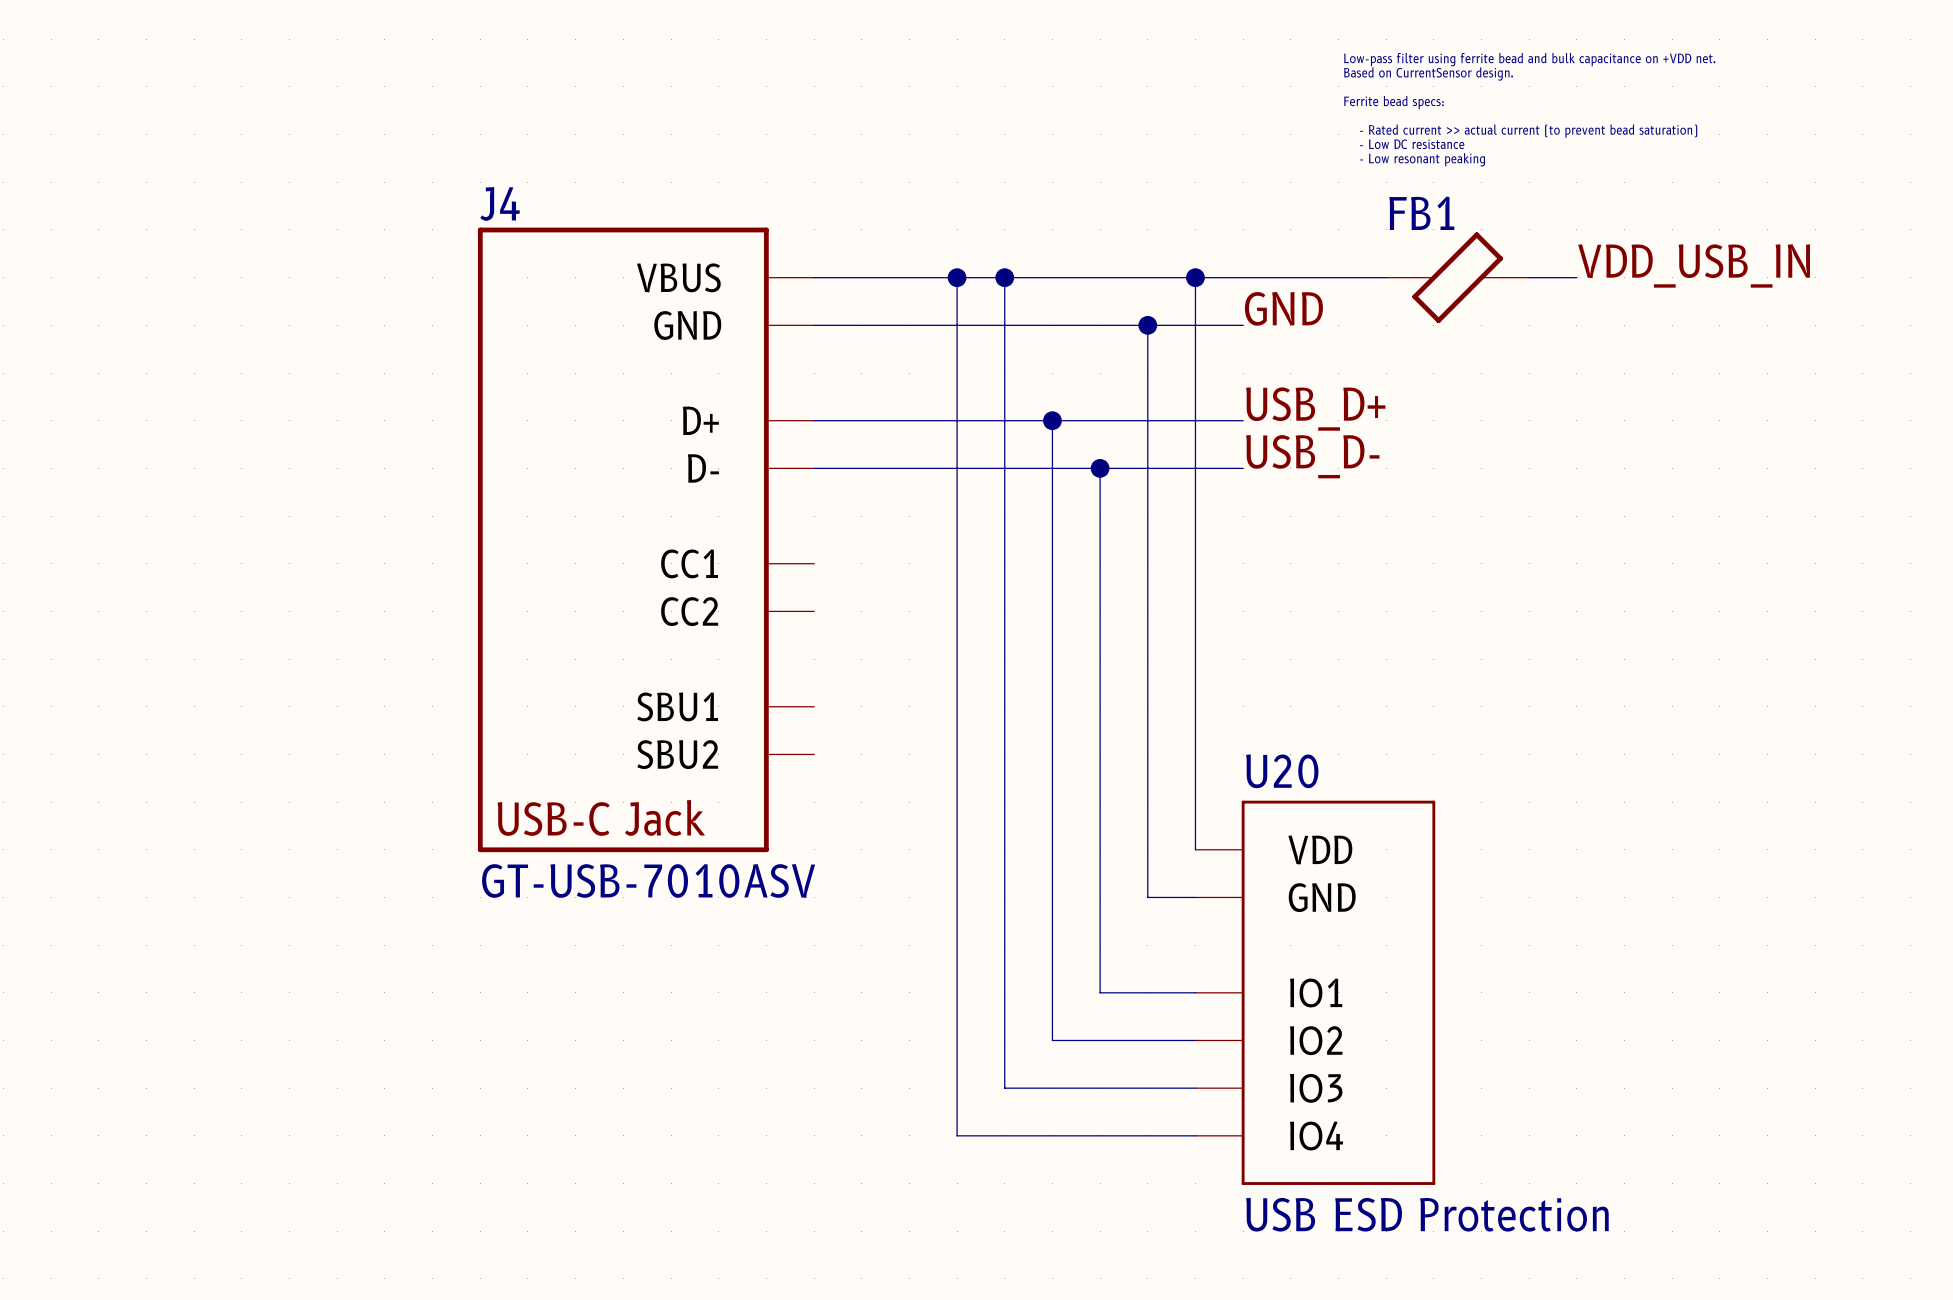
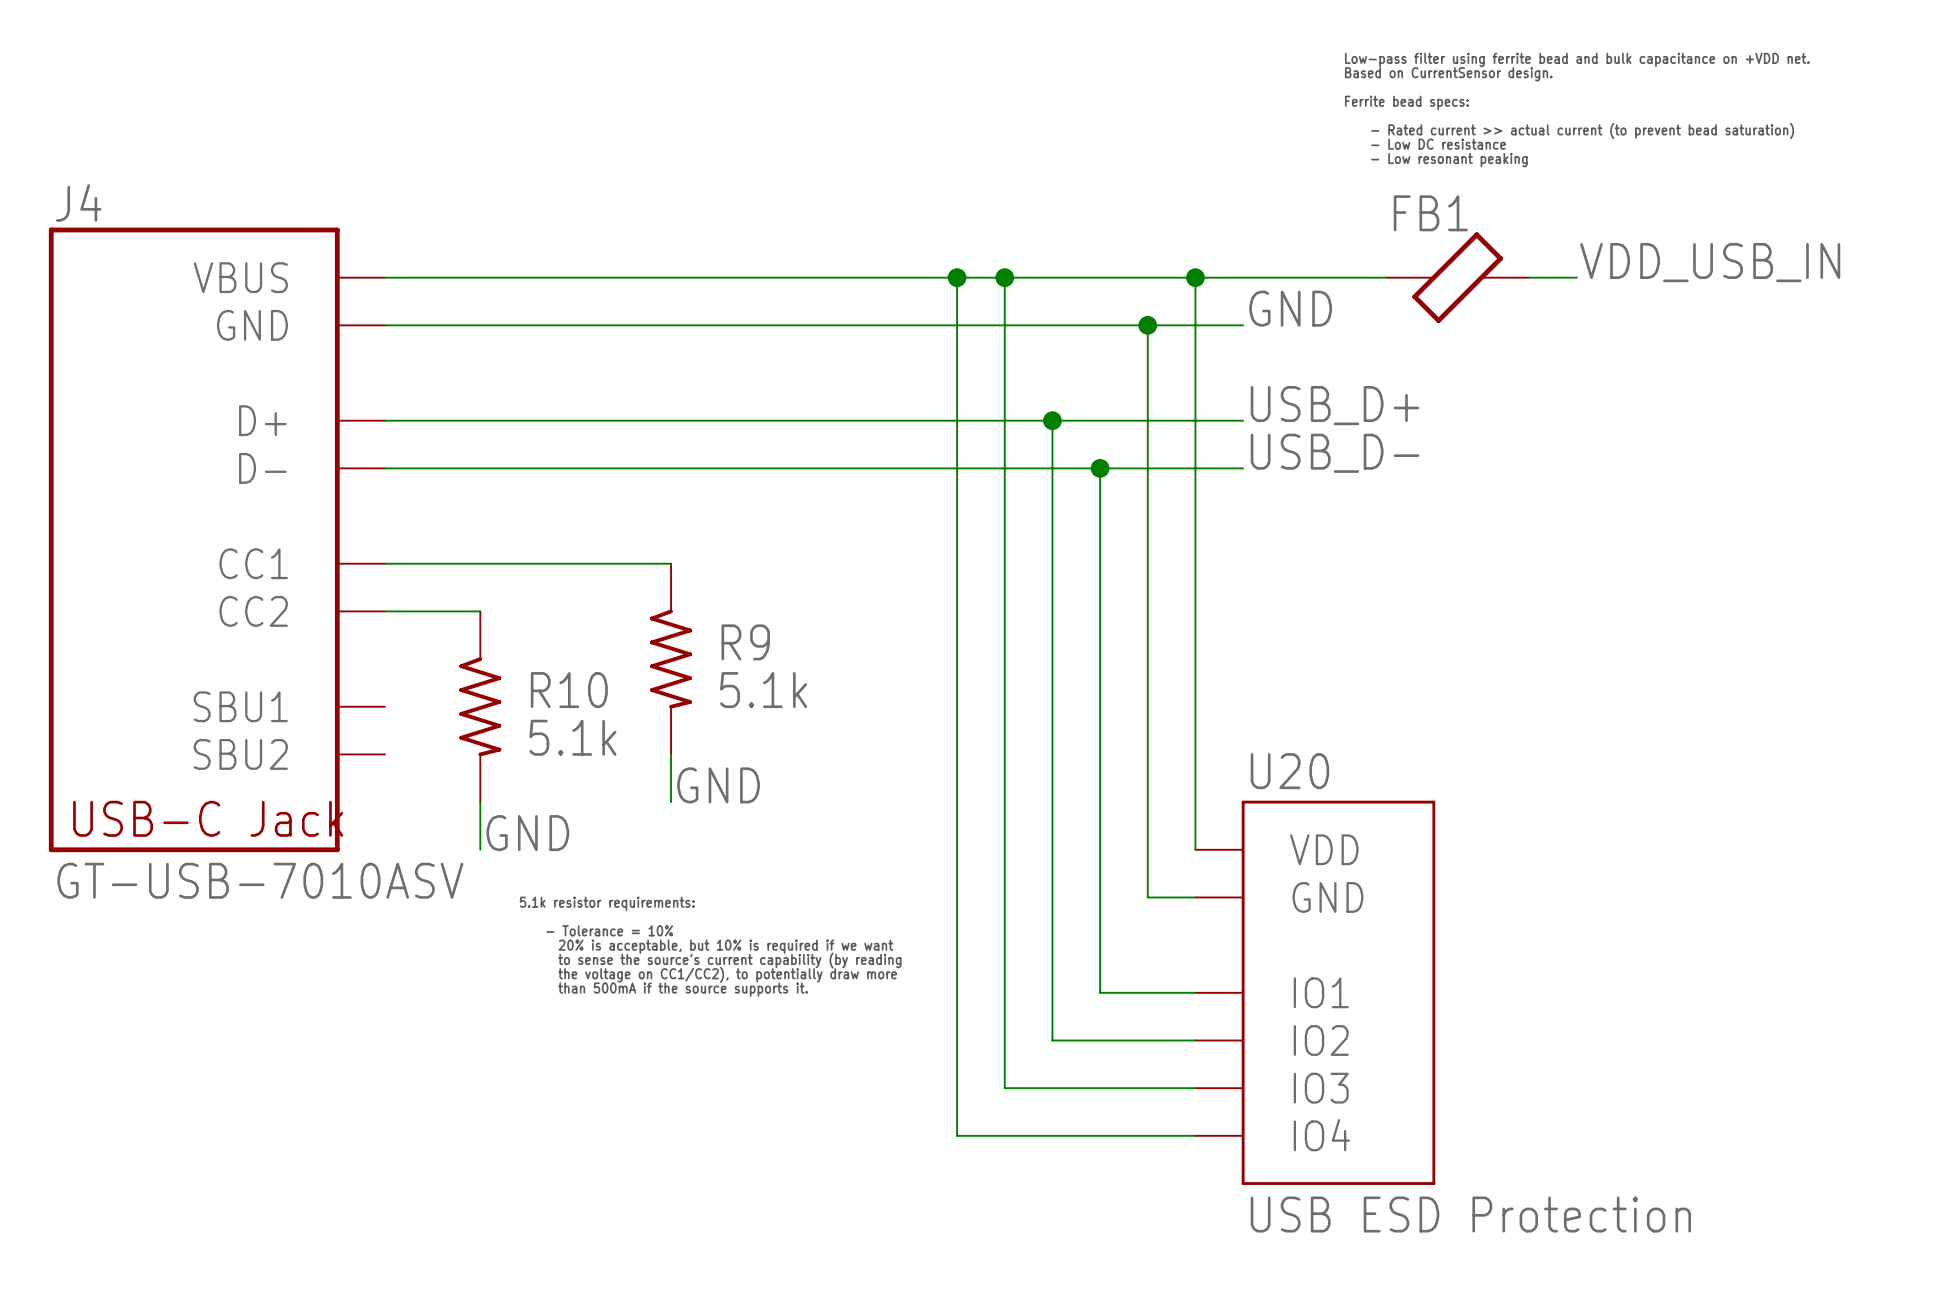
wire: none -> (384, 277) (814, 277)
wire: none -> (384, 325) (814, 325)
wire: none -> (384, 420) (814, 420)
wire: none -> (384, 468) (814, 468)
J4 position: (645, 539) -> (216, 539)
wire: none -> (384, 563) (671, 563)
wire: none -> (384, 611) (480, 611)
R9: none -> 5.1k (671, 659)
R10: none -> 5.1k (480, 706)
wire: none -> (671, 754) (671, 802)
label: none -> GND (718, 785)
label: none -> GND (527, 833)
text: none -> 5.1k resistor requirements: (607, 903)
text: none -> - Tolerance = 10% (609, 930)
text: none -> 20% is acceptable, but 10% is required if we want (725, 946)
text: none -> to sense the source's current capability (by reading (729, 960)
text: none -> the voltage on CC1/CC2), to potentially draw more (727, 974)
text: none -> than 500mA if the source supports it. (683, 989)

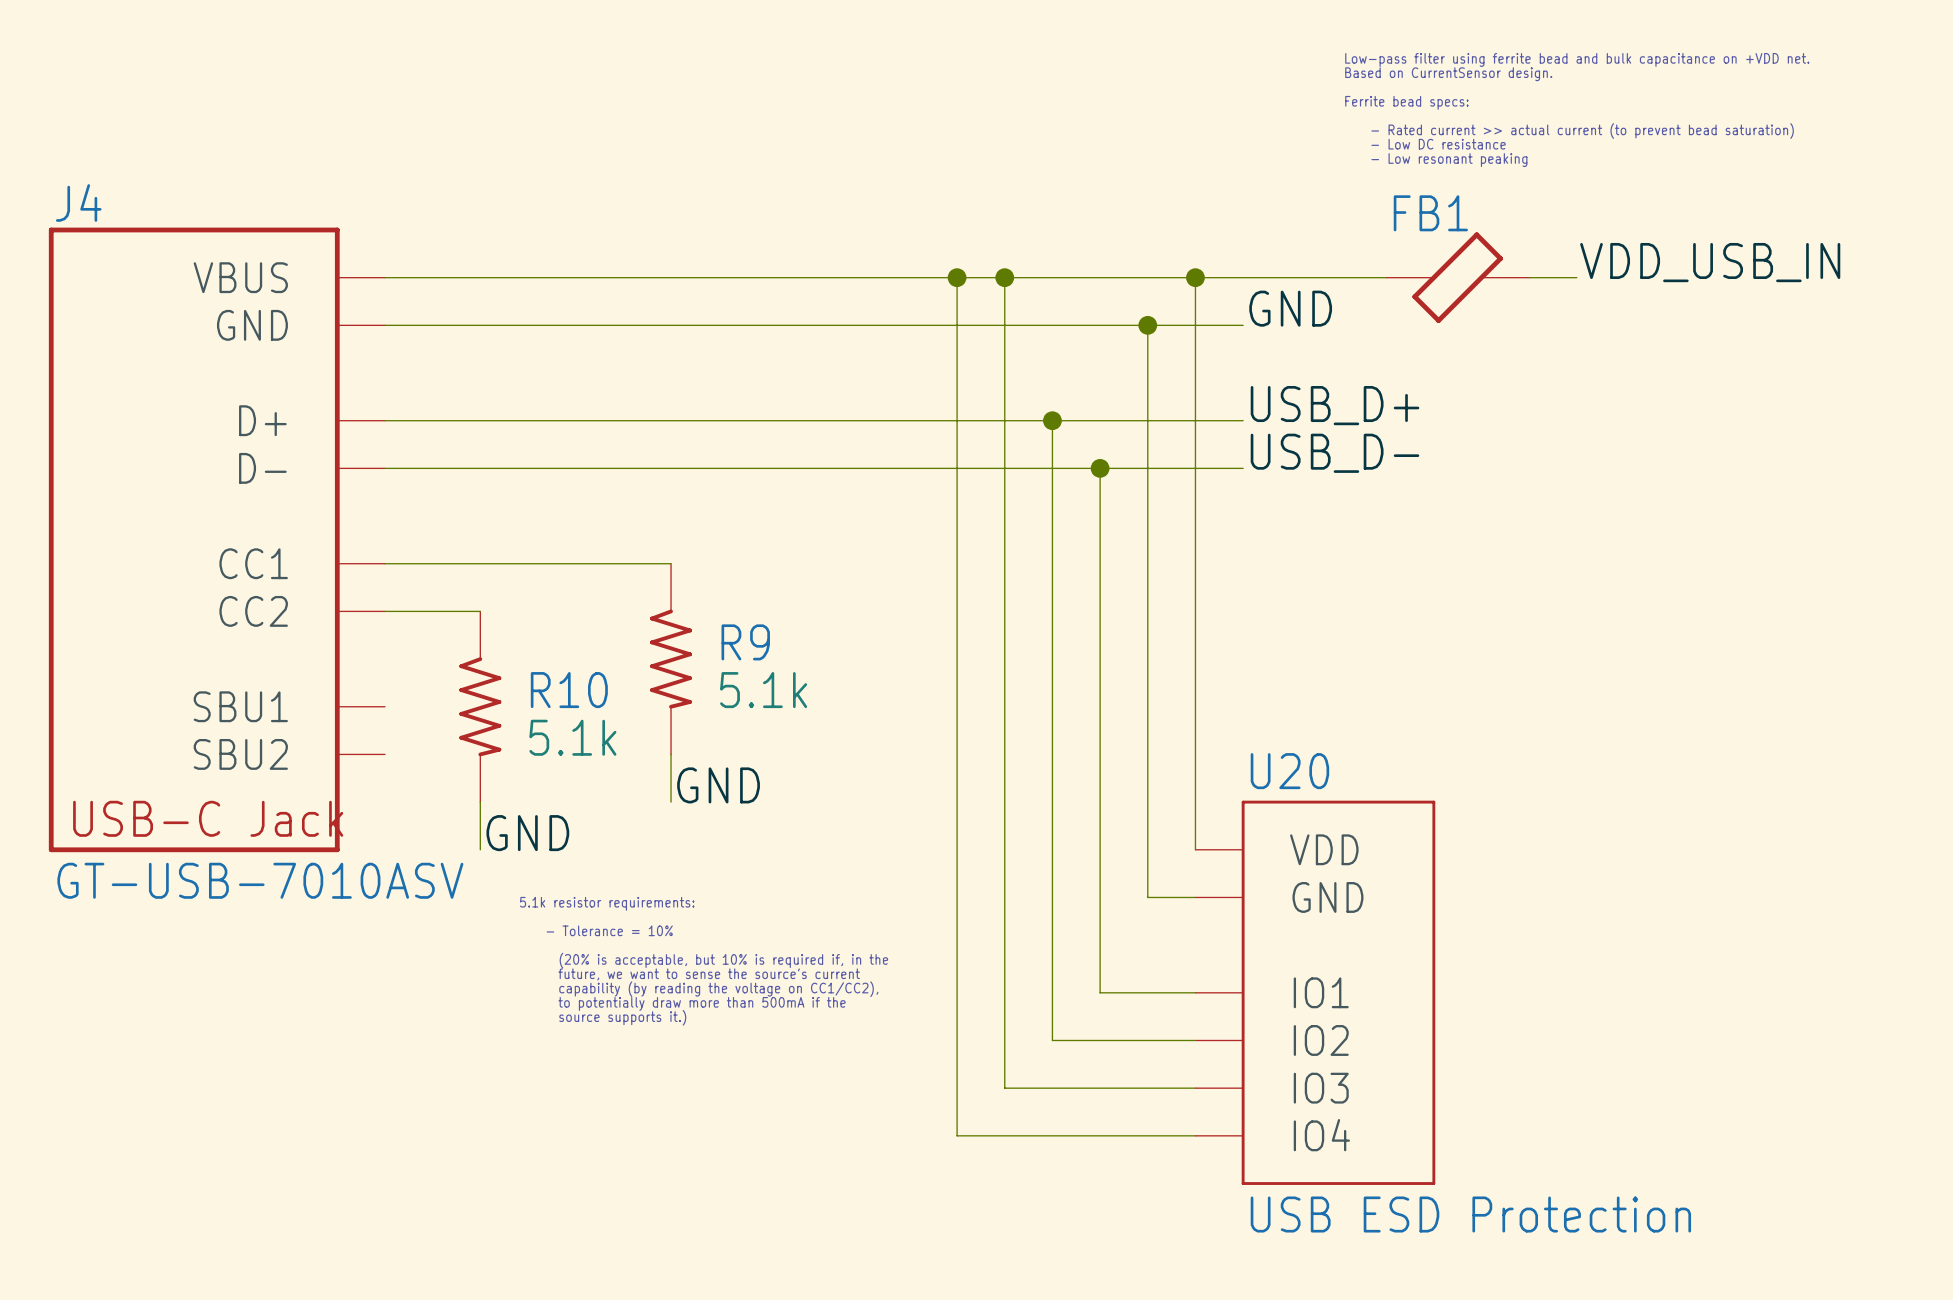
text: 20% is acceptable, but 10% is required if we want (725, 946) -> none
text: to sense the source's current capability (by reading (729, 960) -> (20% is acceptable, but 10% is required if, in the (723, 960)
text: the voltage on CC1/CC2), to potentially draw more (727, 974) -> future, we want to sense the source's current (709, 974)
text: than 500mA if the source supports it. (683, 989) -> capability (by reading the voltage on CC1/CC2), (718, 989)
text: none -> to potentially draw more than 500mA if the (702, 1003)
text: none -> source supports it.) (622, 1017)

